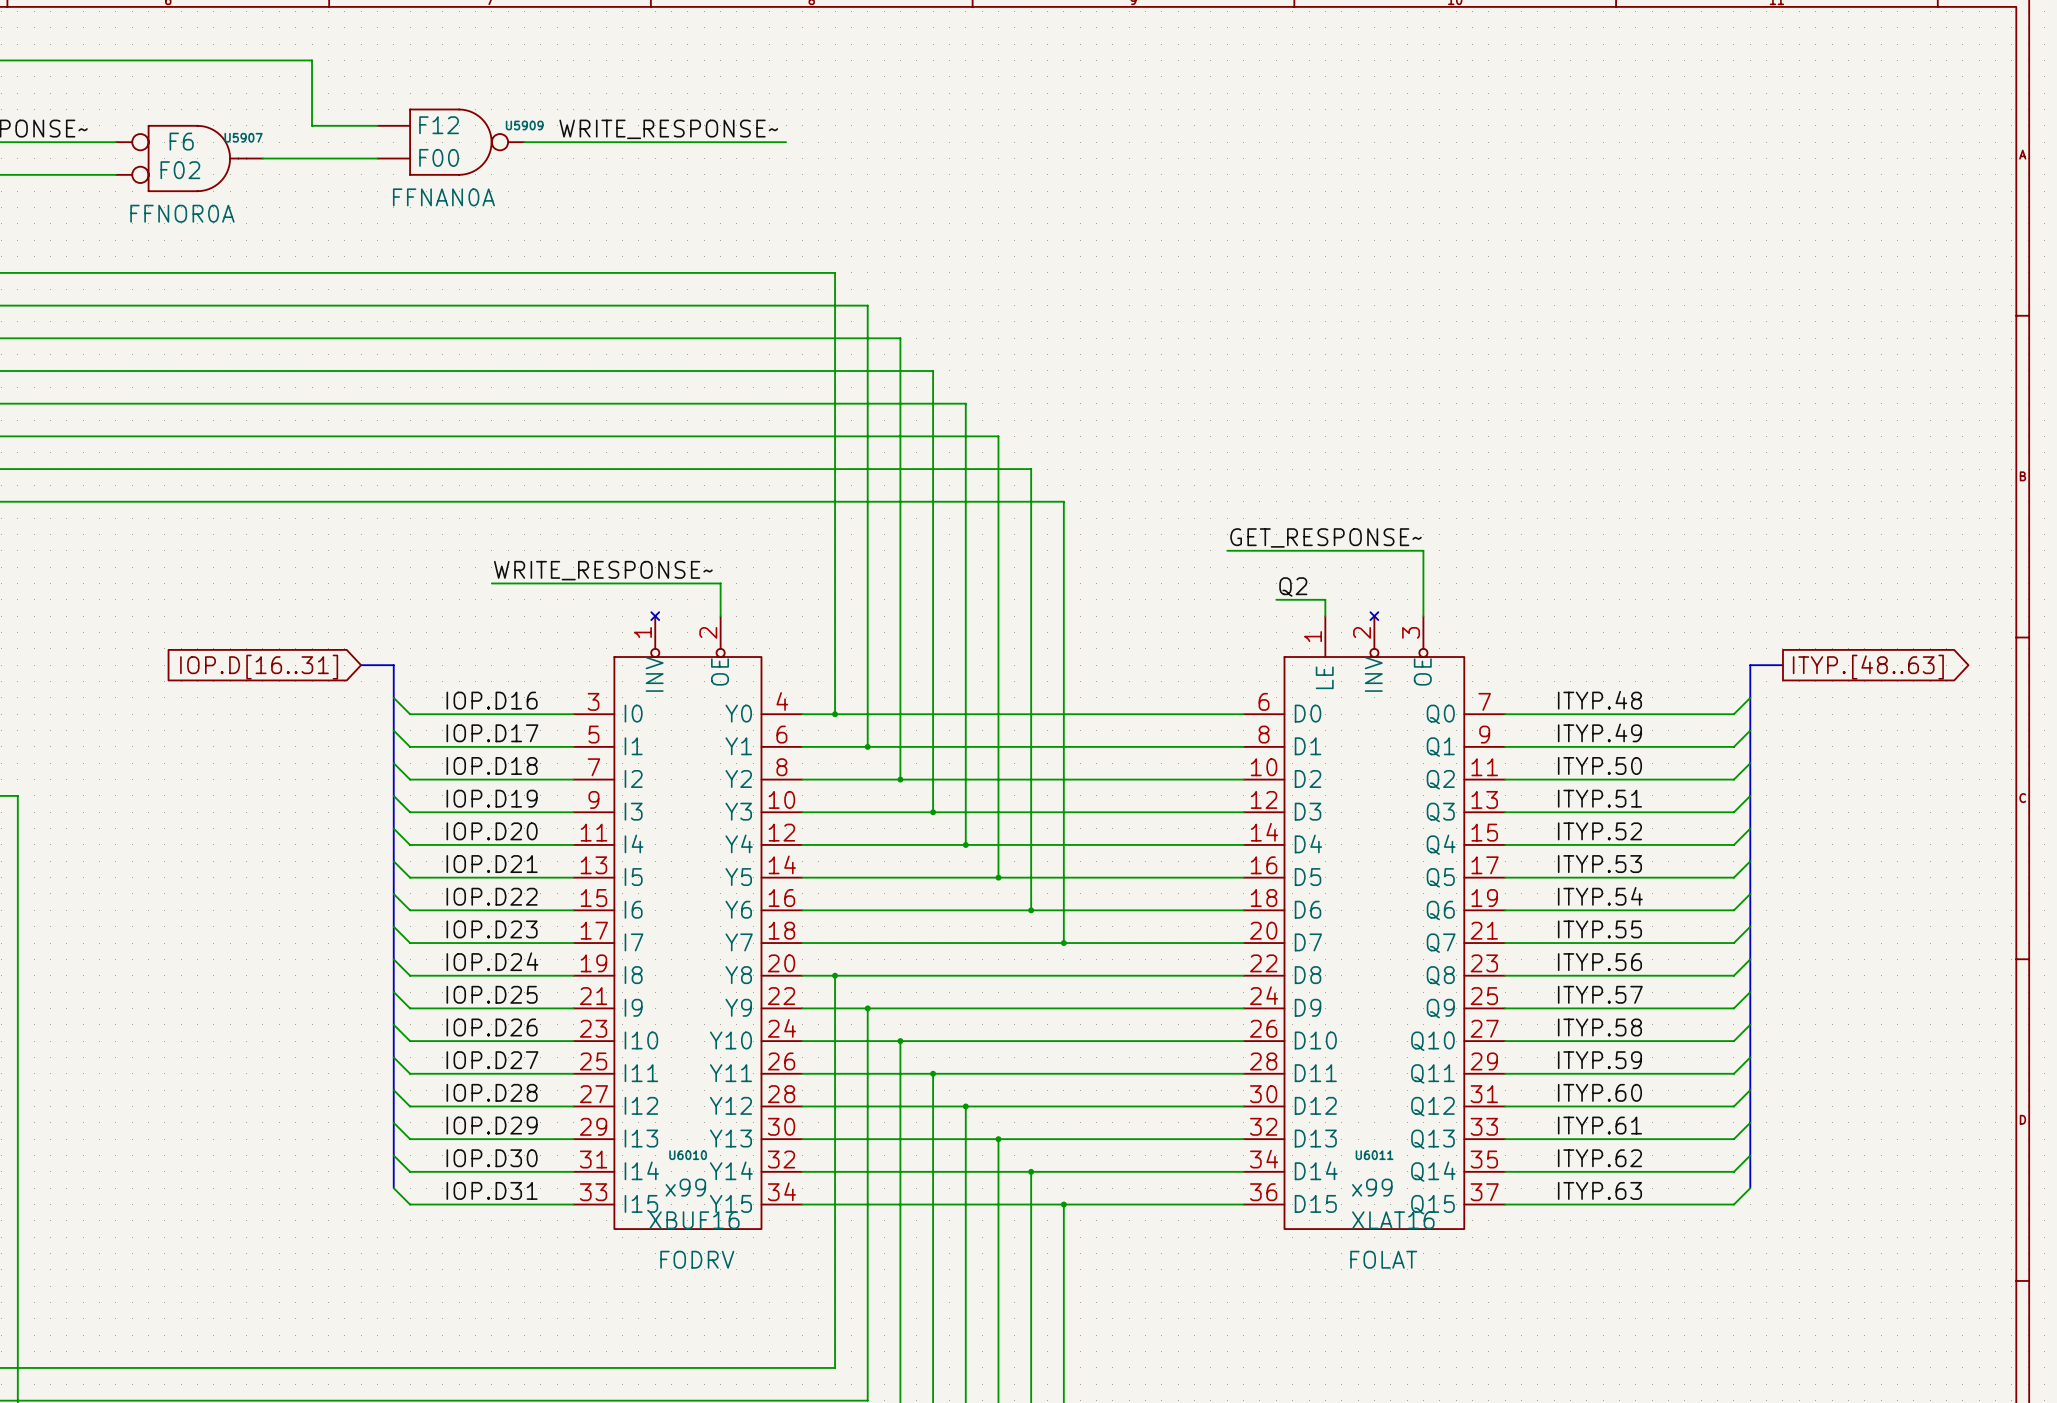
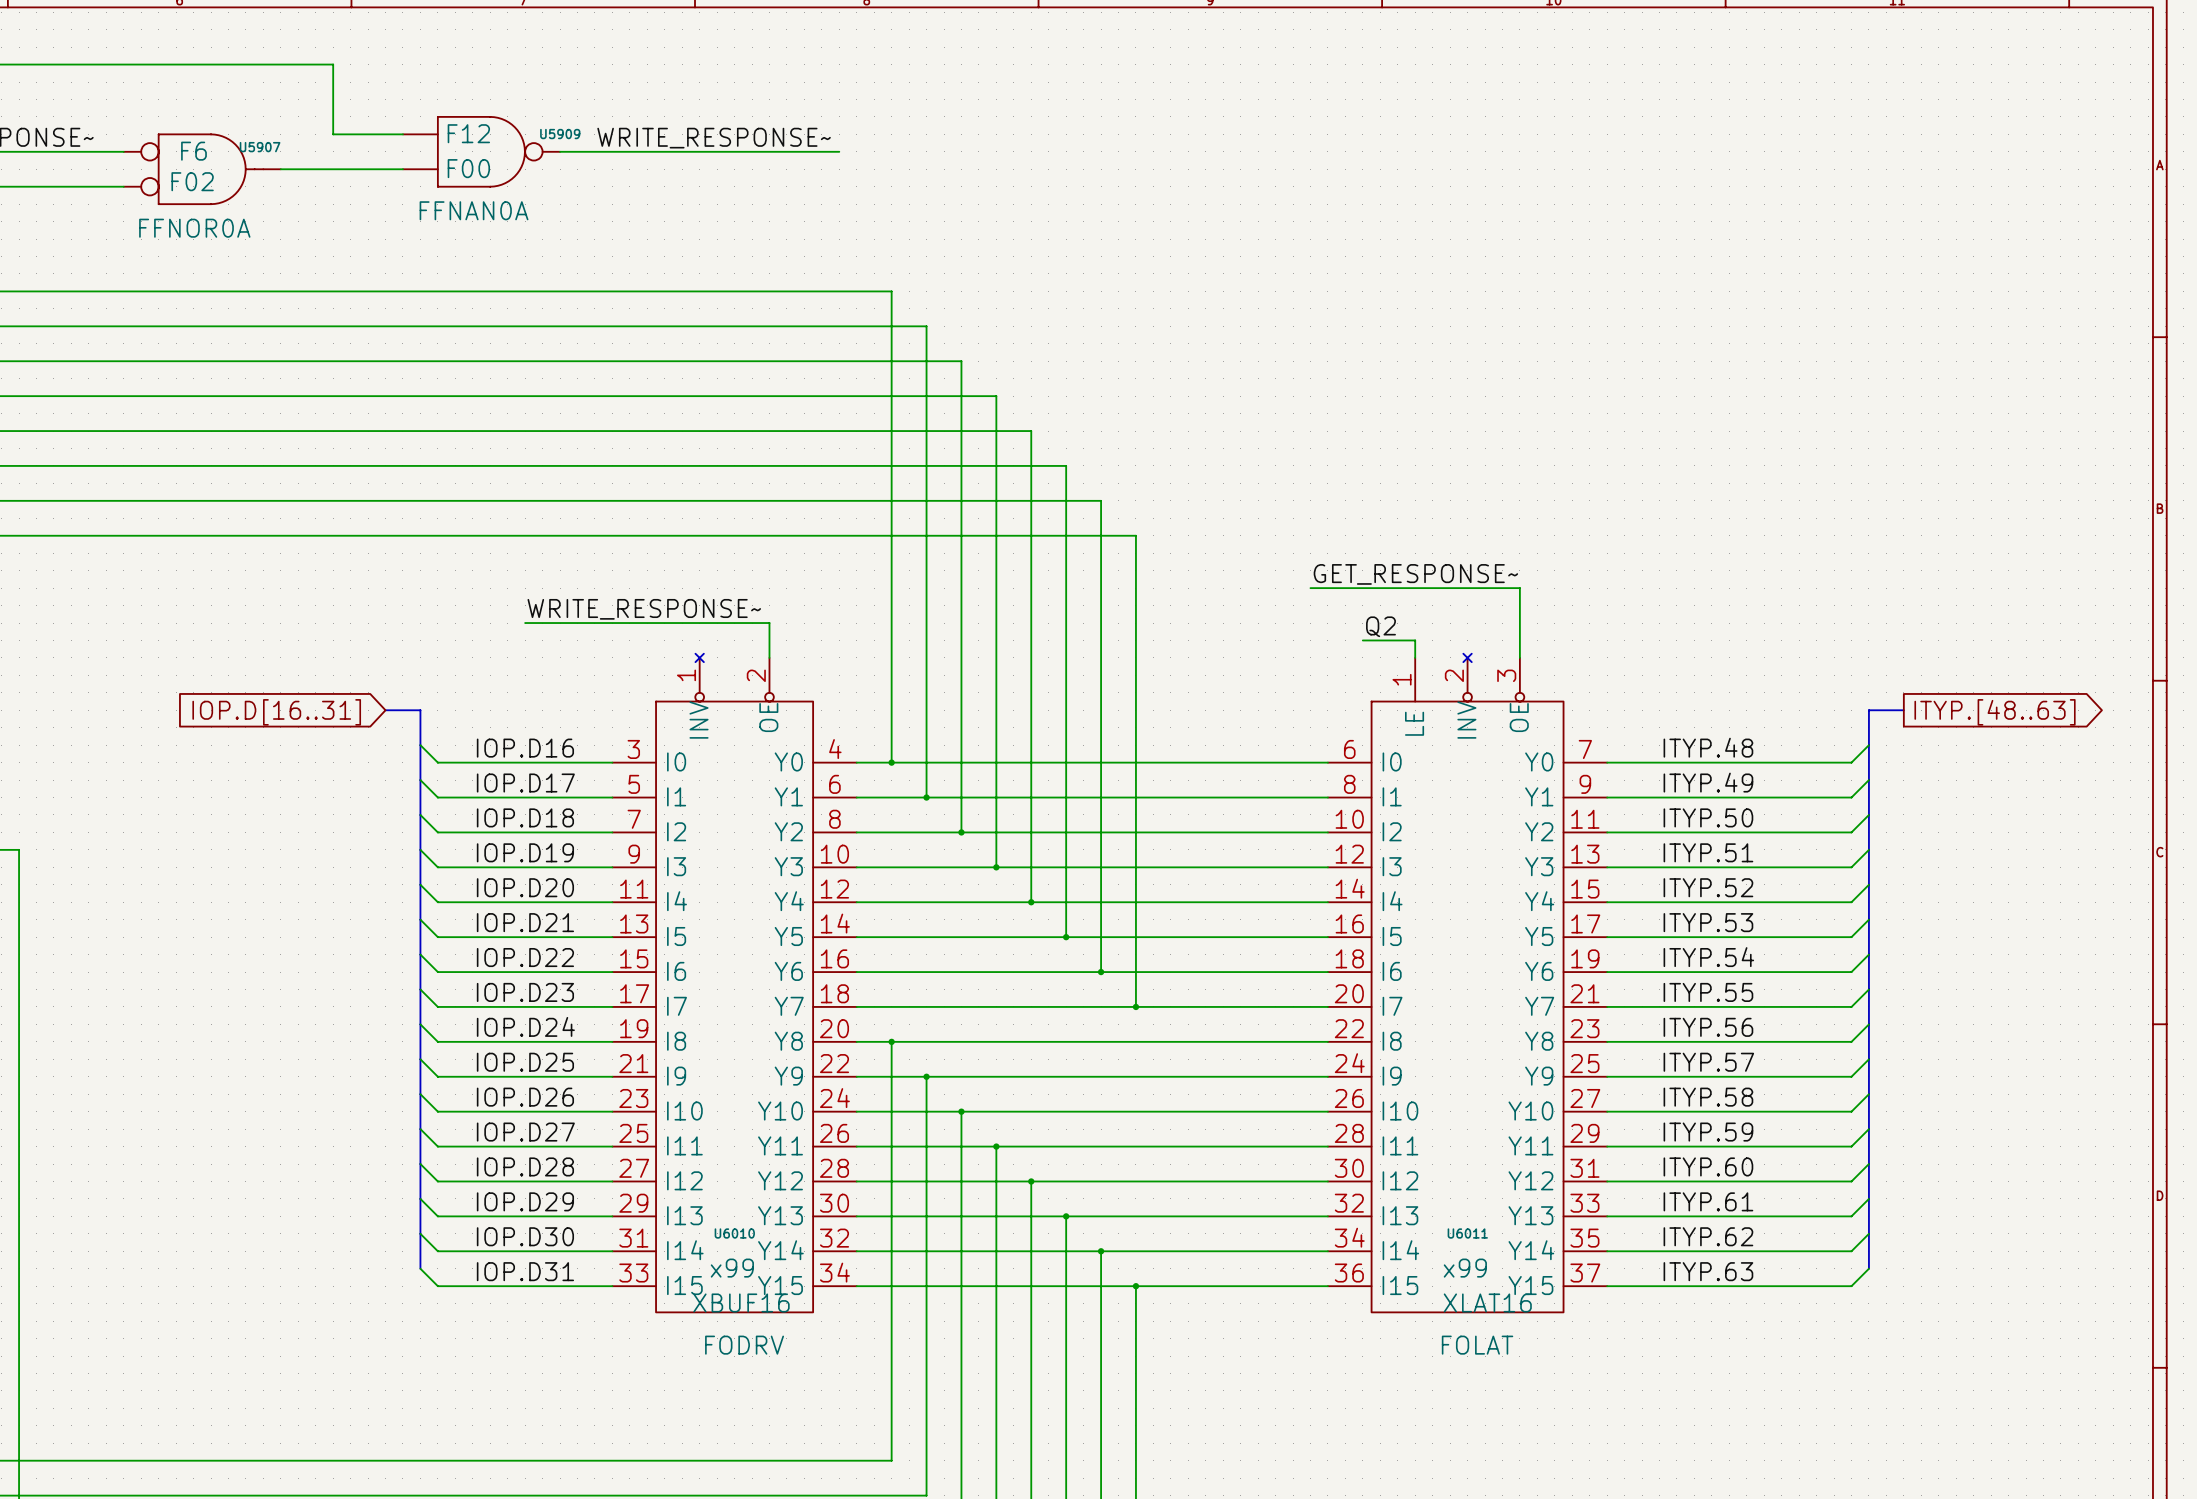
U6011 symbol: [1243, 616, 1506, 1230] -> [1327, 657, 1608, 1313]

